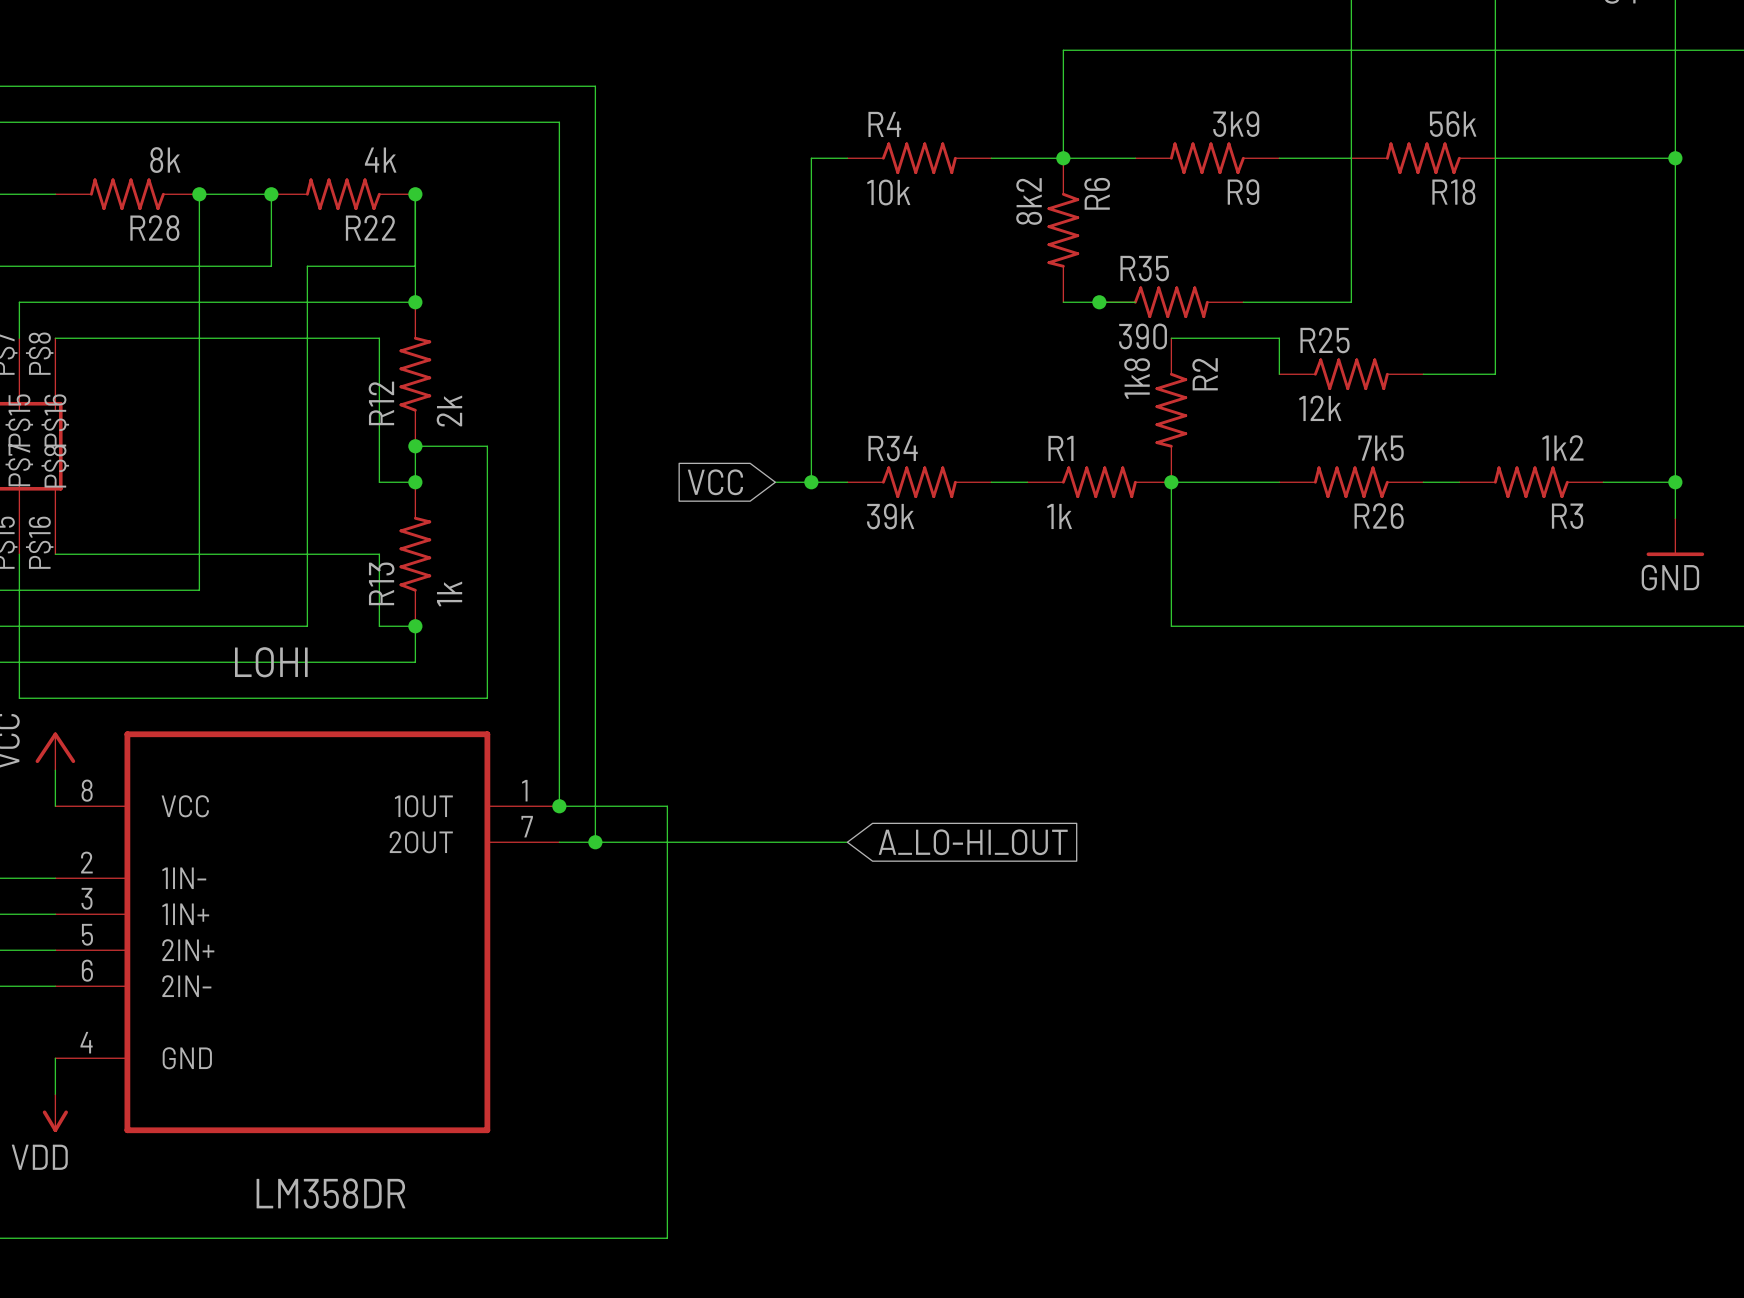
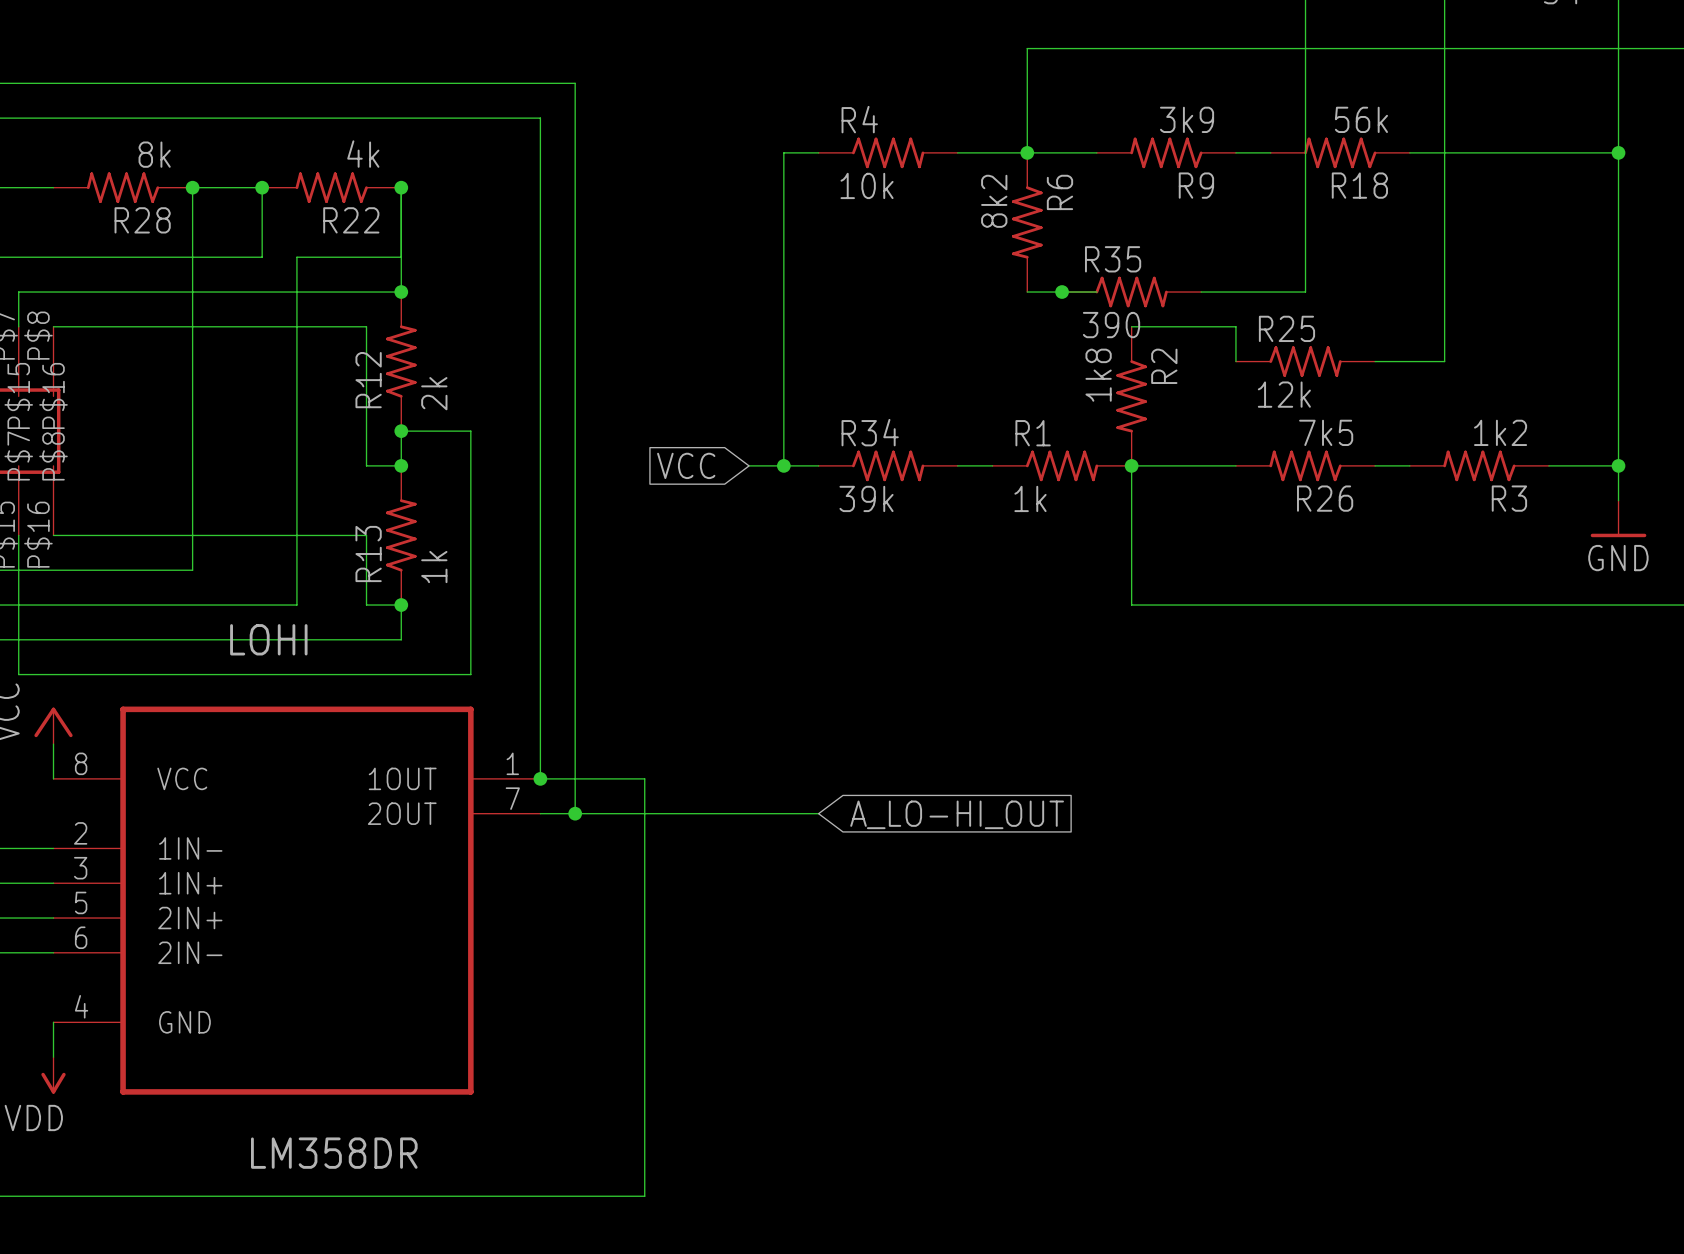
R18 position: (1423, 158) -> (1340, 152)

